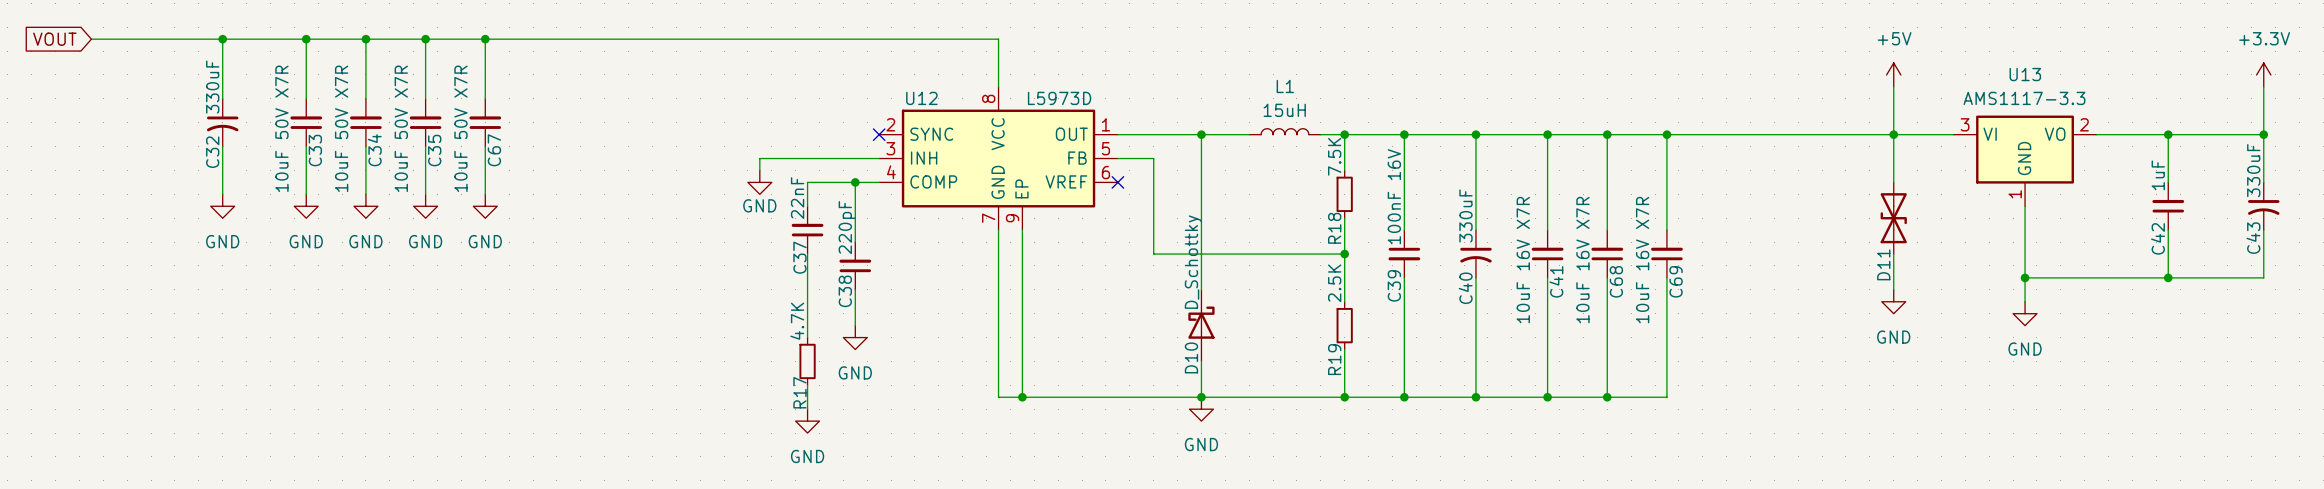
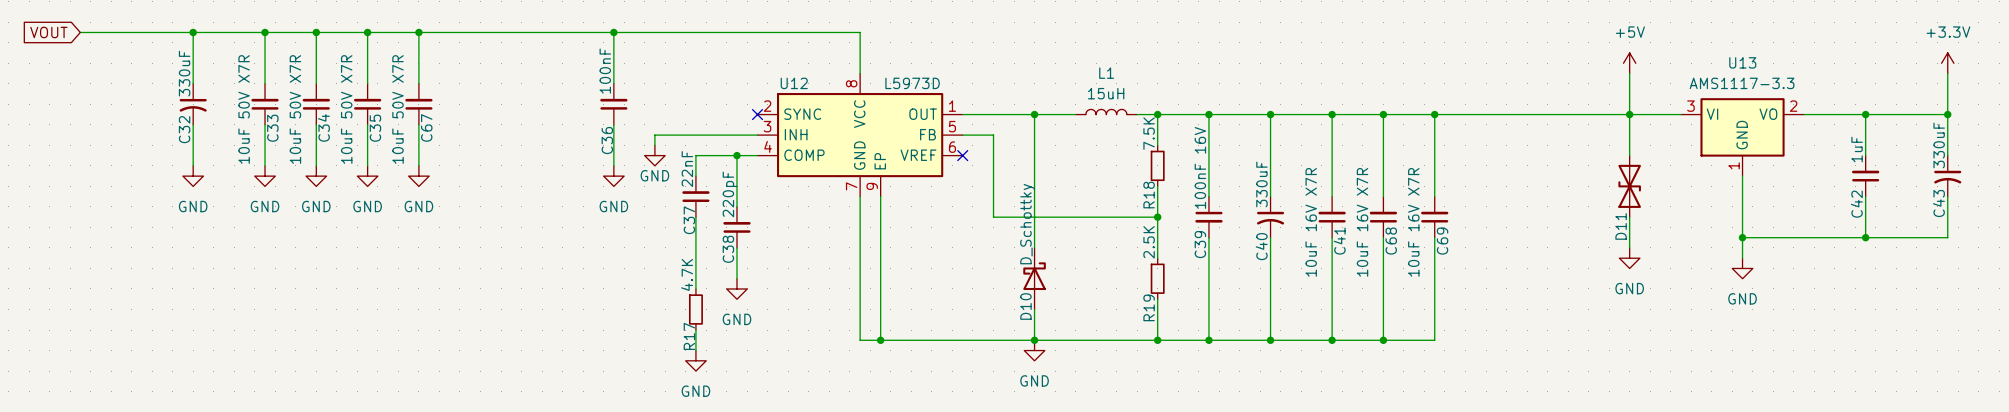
wire: none -> (613, 32) (613, 83)
junction: none -> (613, 32)
C36: none -> 100nF (613, 104)
wire: none -> (613, 124) (613, 165)
power symbol: none -> GND (613, 176)

